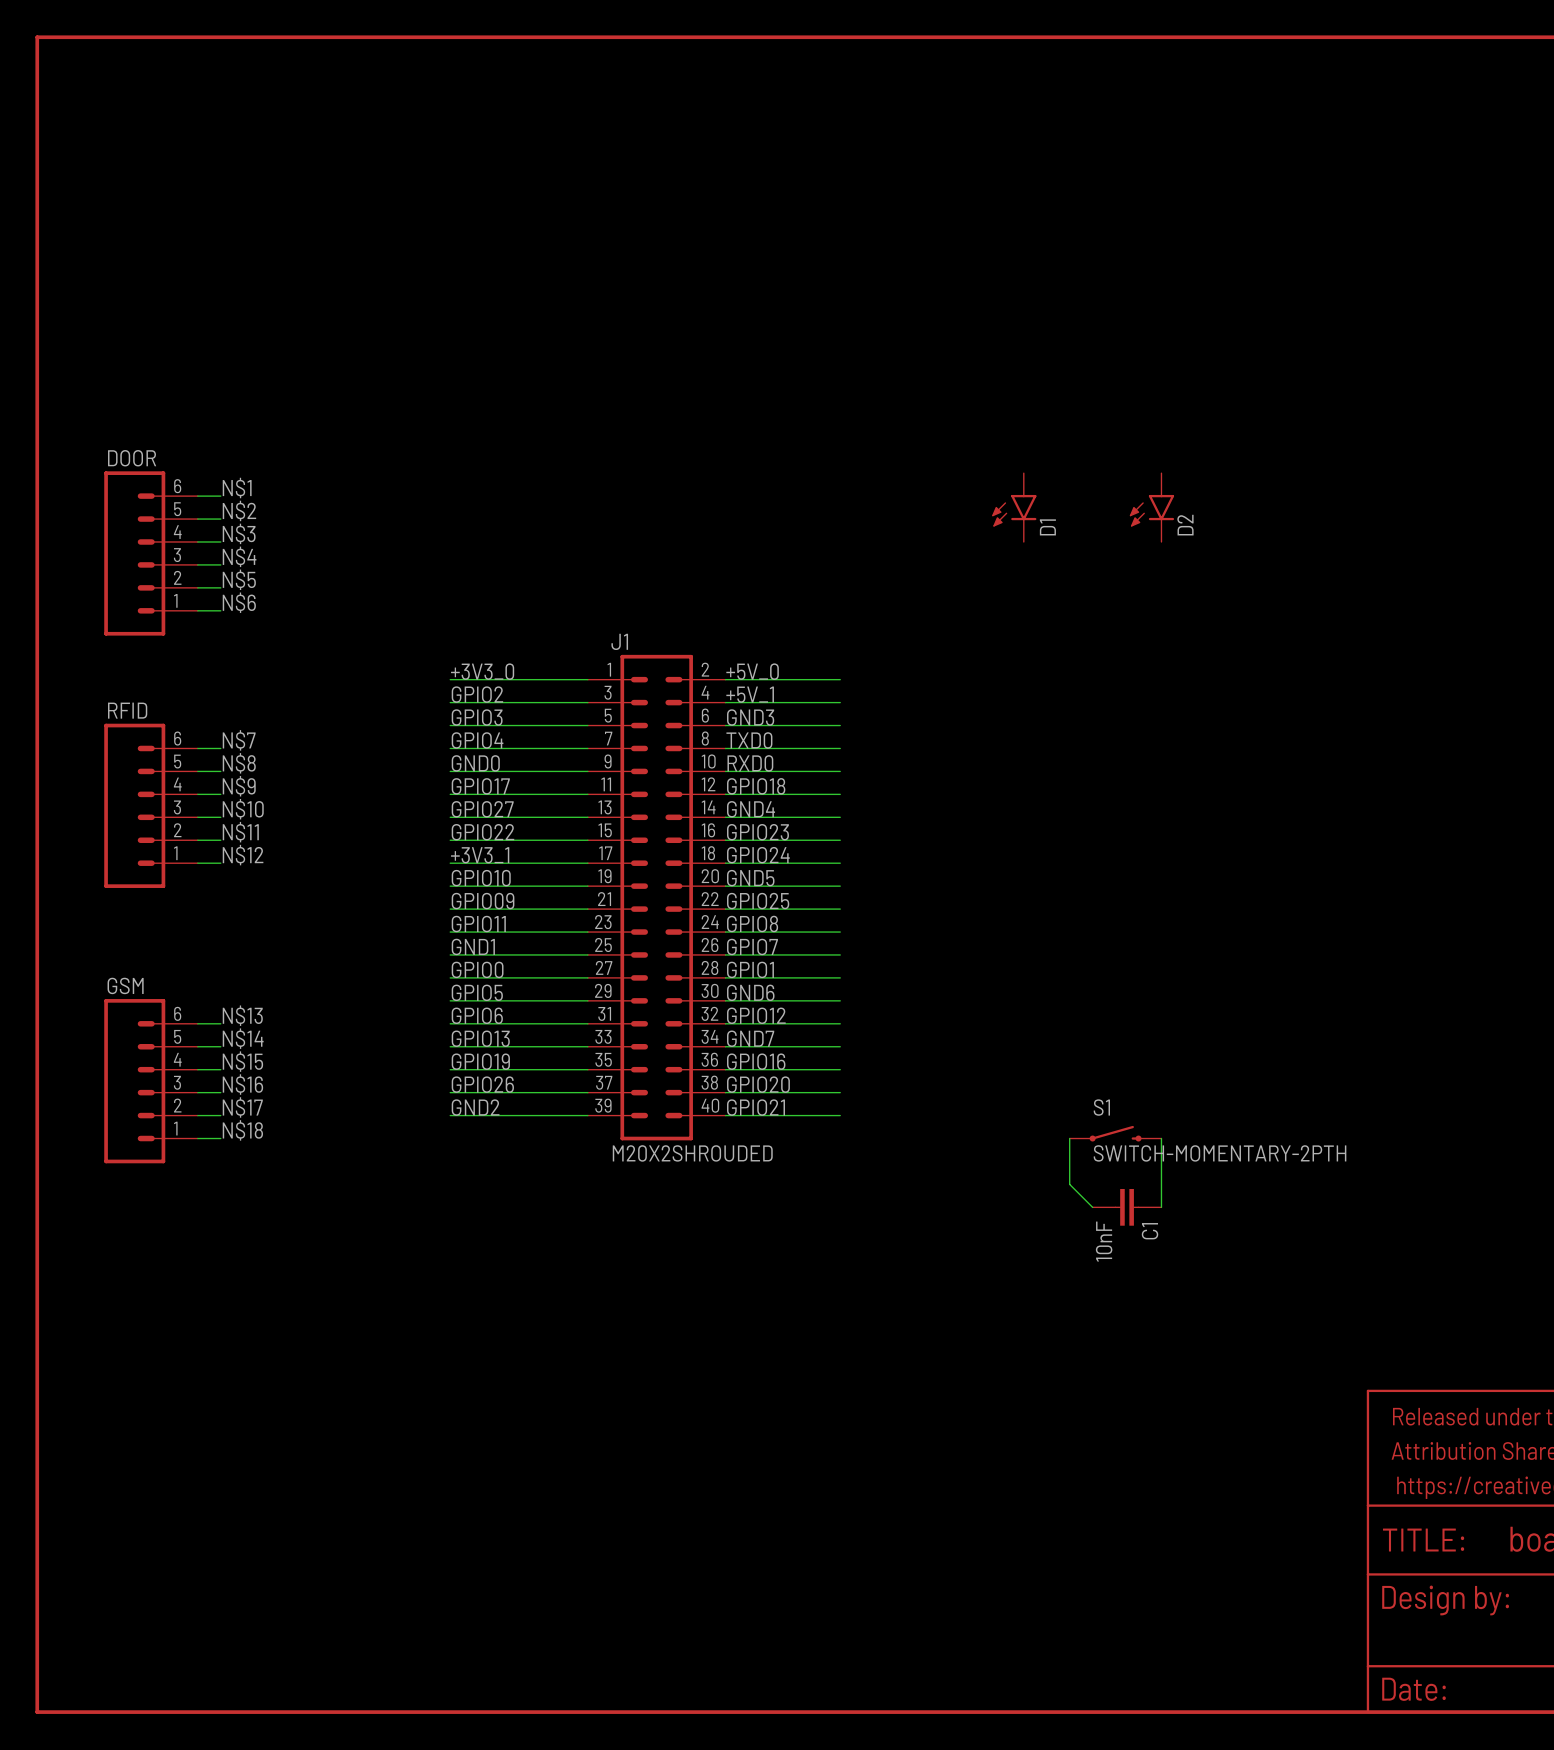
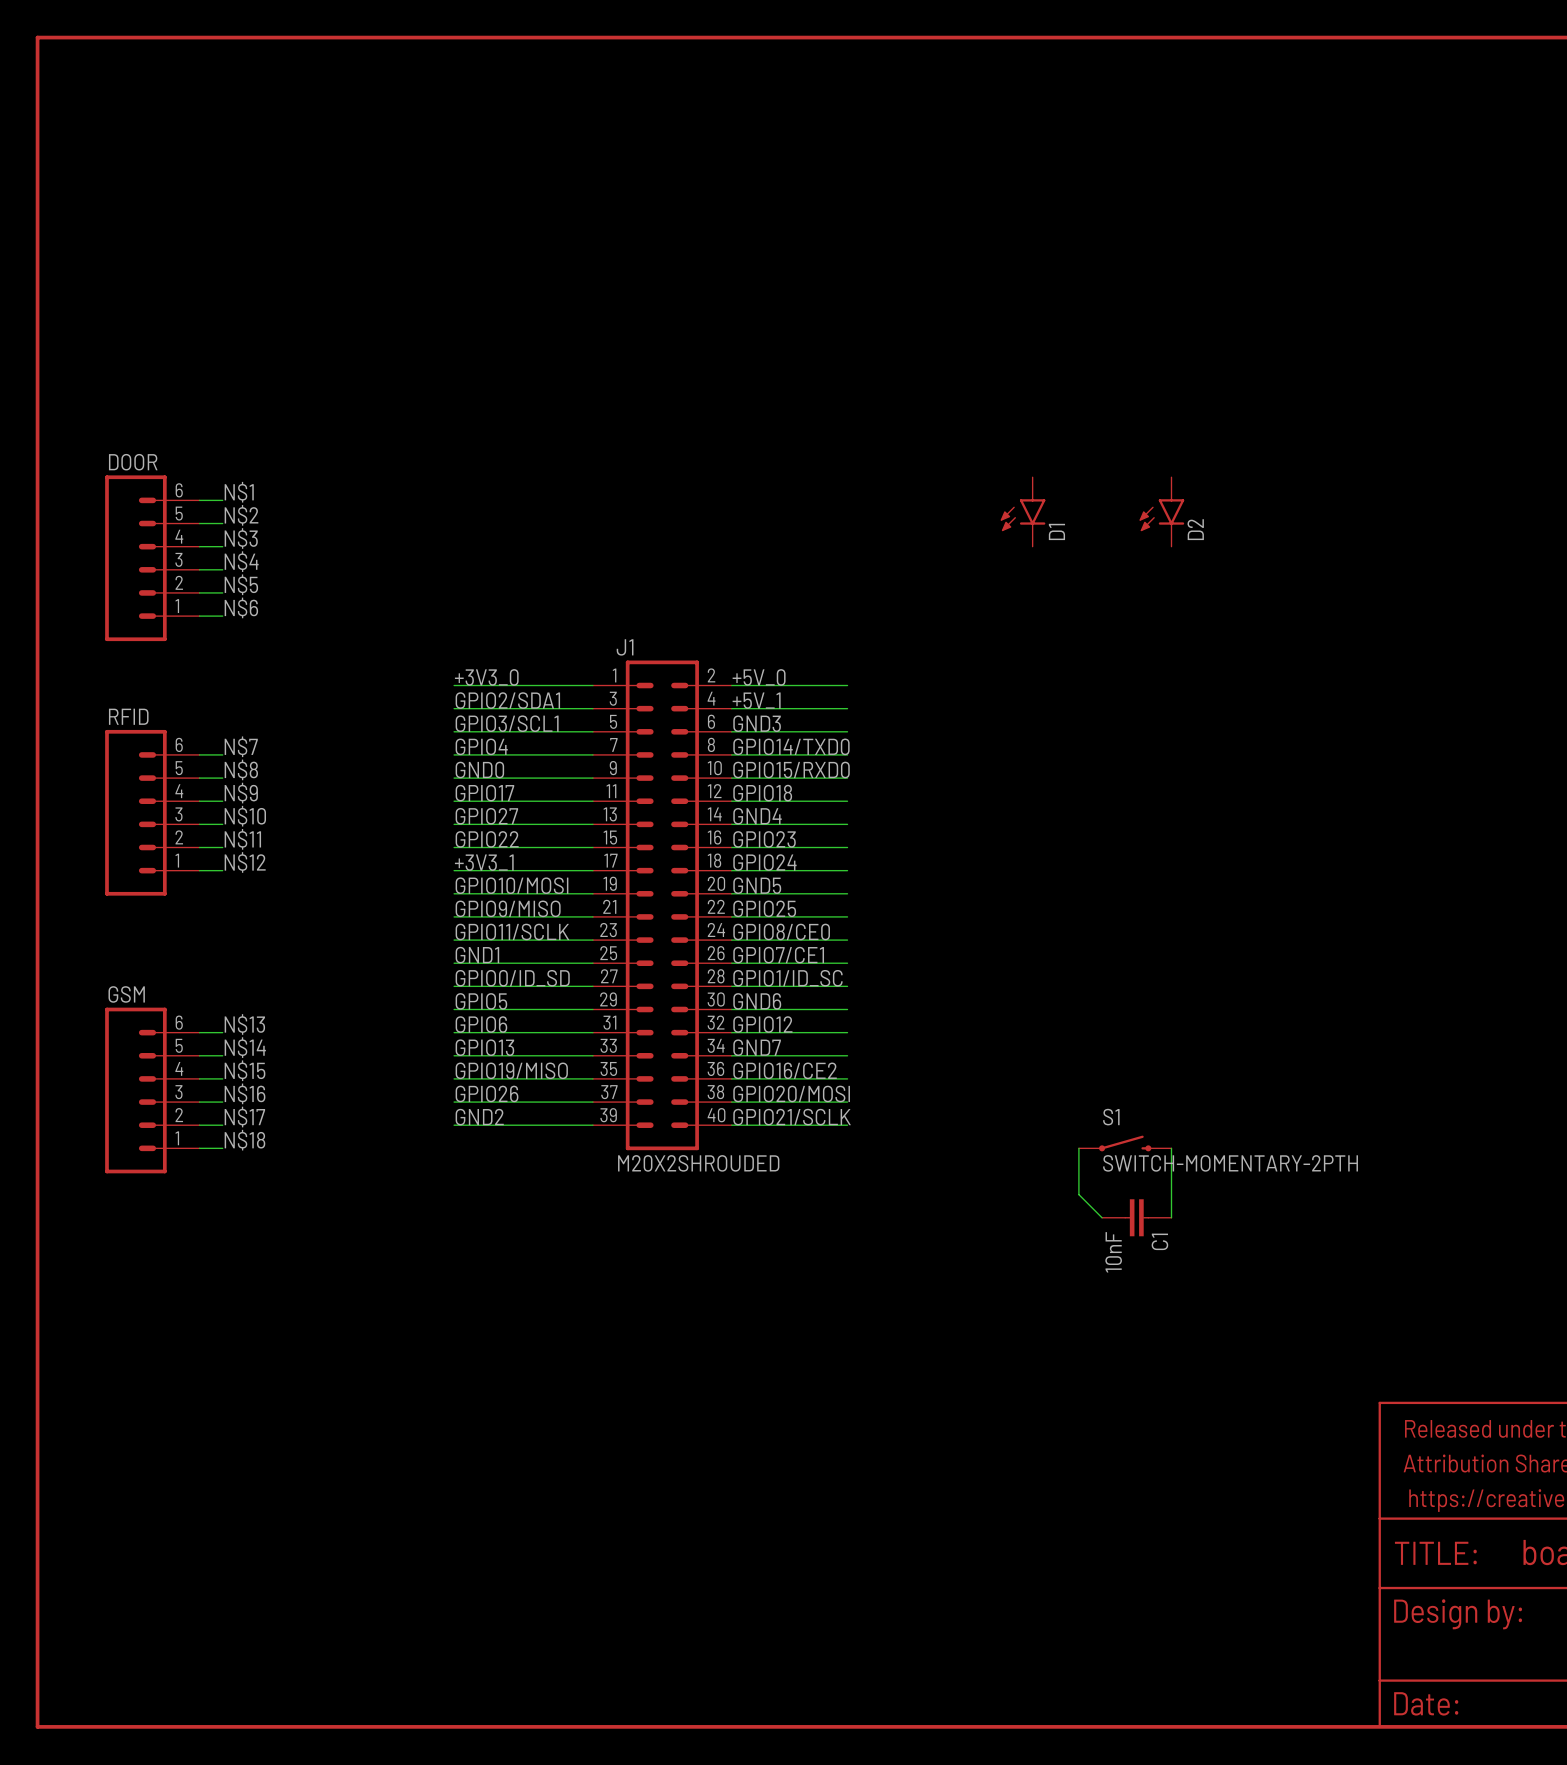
label: GPIO2 (477, 694) -> GPIO2/SDA1 (507, 700)
label: GPIO3 (477, 717) -> GPIO3/SCL1 (507, 723)
label: TXD0 (749, 740) -> GPIO14/TXD0 (791, 746)
label: RXD0 (750, 763) -> GPIO15/RXD0 (791, 769)
label: GPIO10 (481, 878) -> GPIO10/MOSI (511, 885)
label: GPIO09 (483, 901) -> GPIO9/MISO (508, 908)
label: GPIO8 (752, 923) -> GPIO8/CE0 (781, 931)
label: GPIO11 (478, 924) -> GPIO11/SCLK (512, 931)
label: GPIO7 (752, 946) -> GPIO7/CE1 (778, 955)
label: GPIO0 (477, 969) -> GPIO0/ID_SD (512, 978)
label: GPIO1 (750, 969) -> GPIO1/ID_SC (787, 978)
label: GPIO19 (480, 1061) -> GPIO19/MISO (511, 1070)
label: GPIO16 (756, 1061) -> GPIO16/CE2 (785, 1070)
label: GPIO20 (758, 1084) -> GPIO20/MOSI (791, 1093)
label: GPIO21 (756, 1107) -> GPIO21/SCLK (792, 1117)

